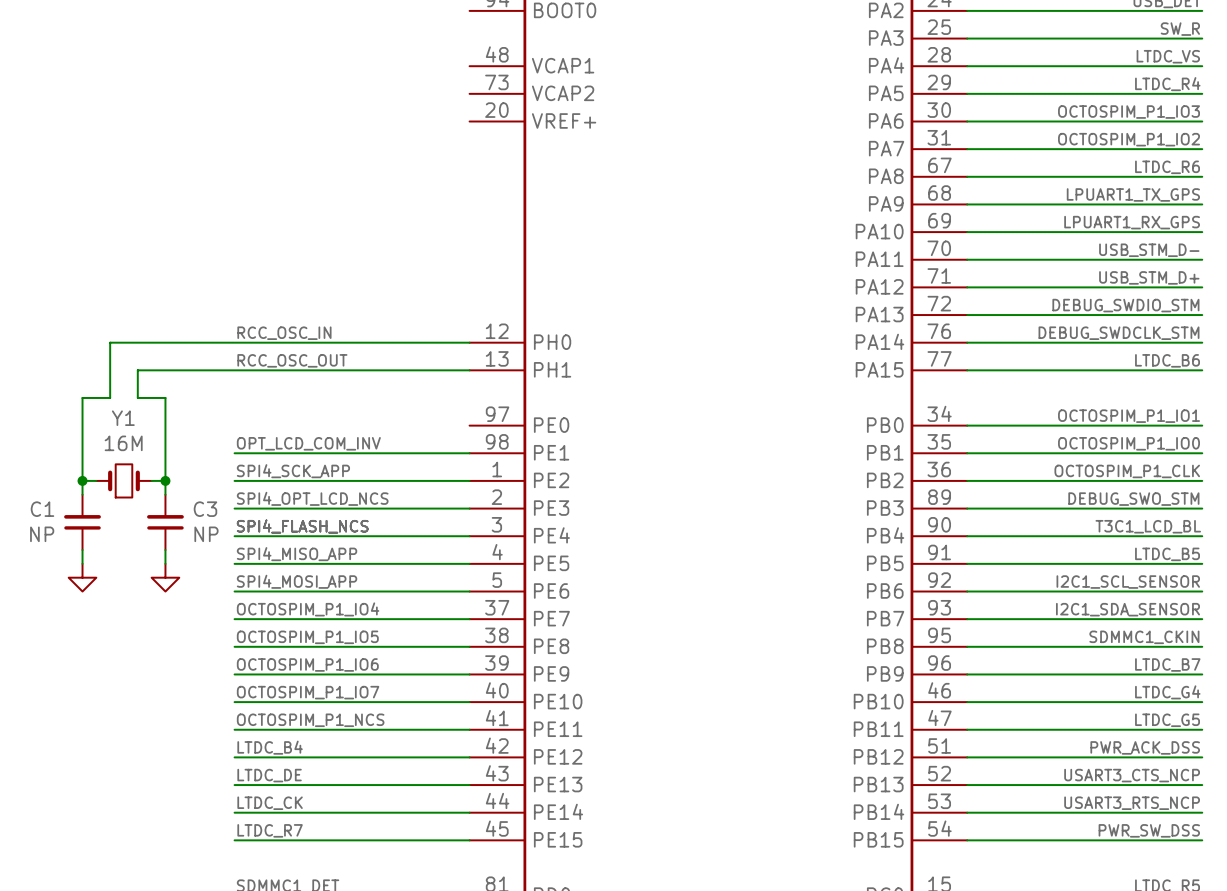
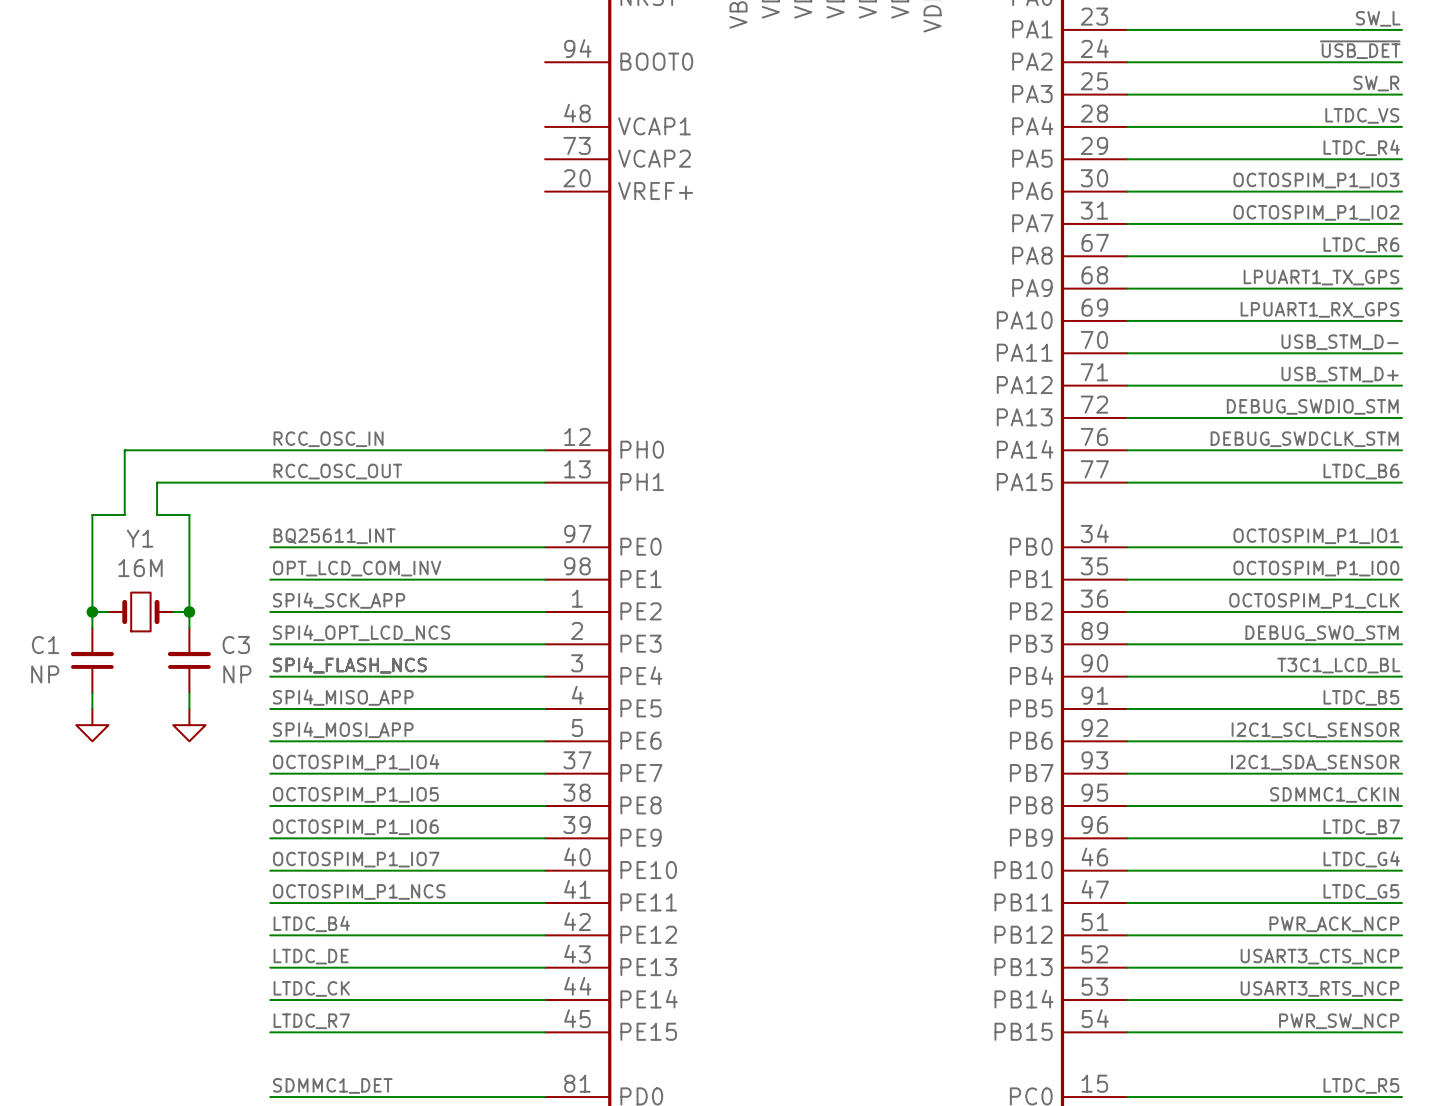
label: none -> BQ25611_INT (334, 536)
wire: none -> (270, 547) (545, 547)
label: PWR_ACK_DSS (1145, 747) -> PWR_ACK_NCP (1334, 924)
label: PWR_SW_DSS (1149, 830) -> PWR_SW_NCP (1339, 1021)

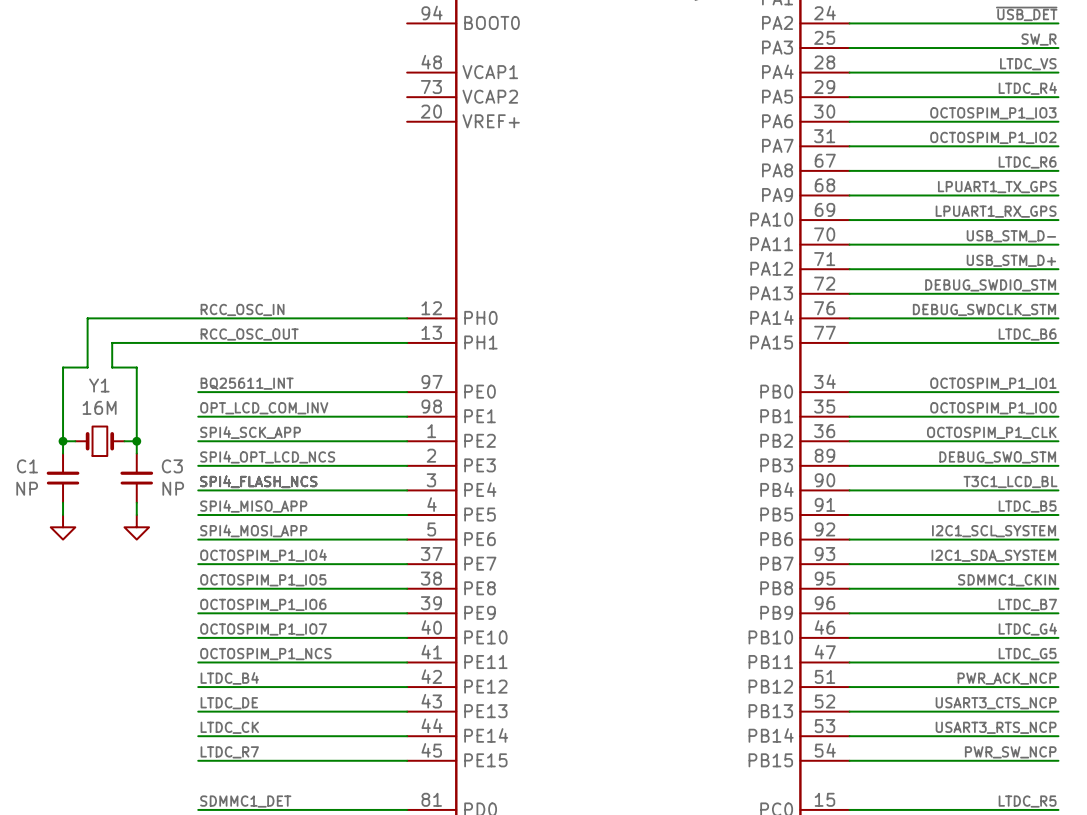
label: I2C1_SCL_SENSOR (1315, 730) -> I2C1_SCL_SYSTEM (994, 531)
label: I2C1_SDA_SENSOR (1315, 762) -> I2C1_SDA_SYSTEM (993, 555)

